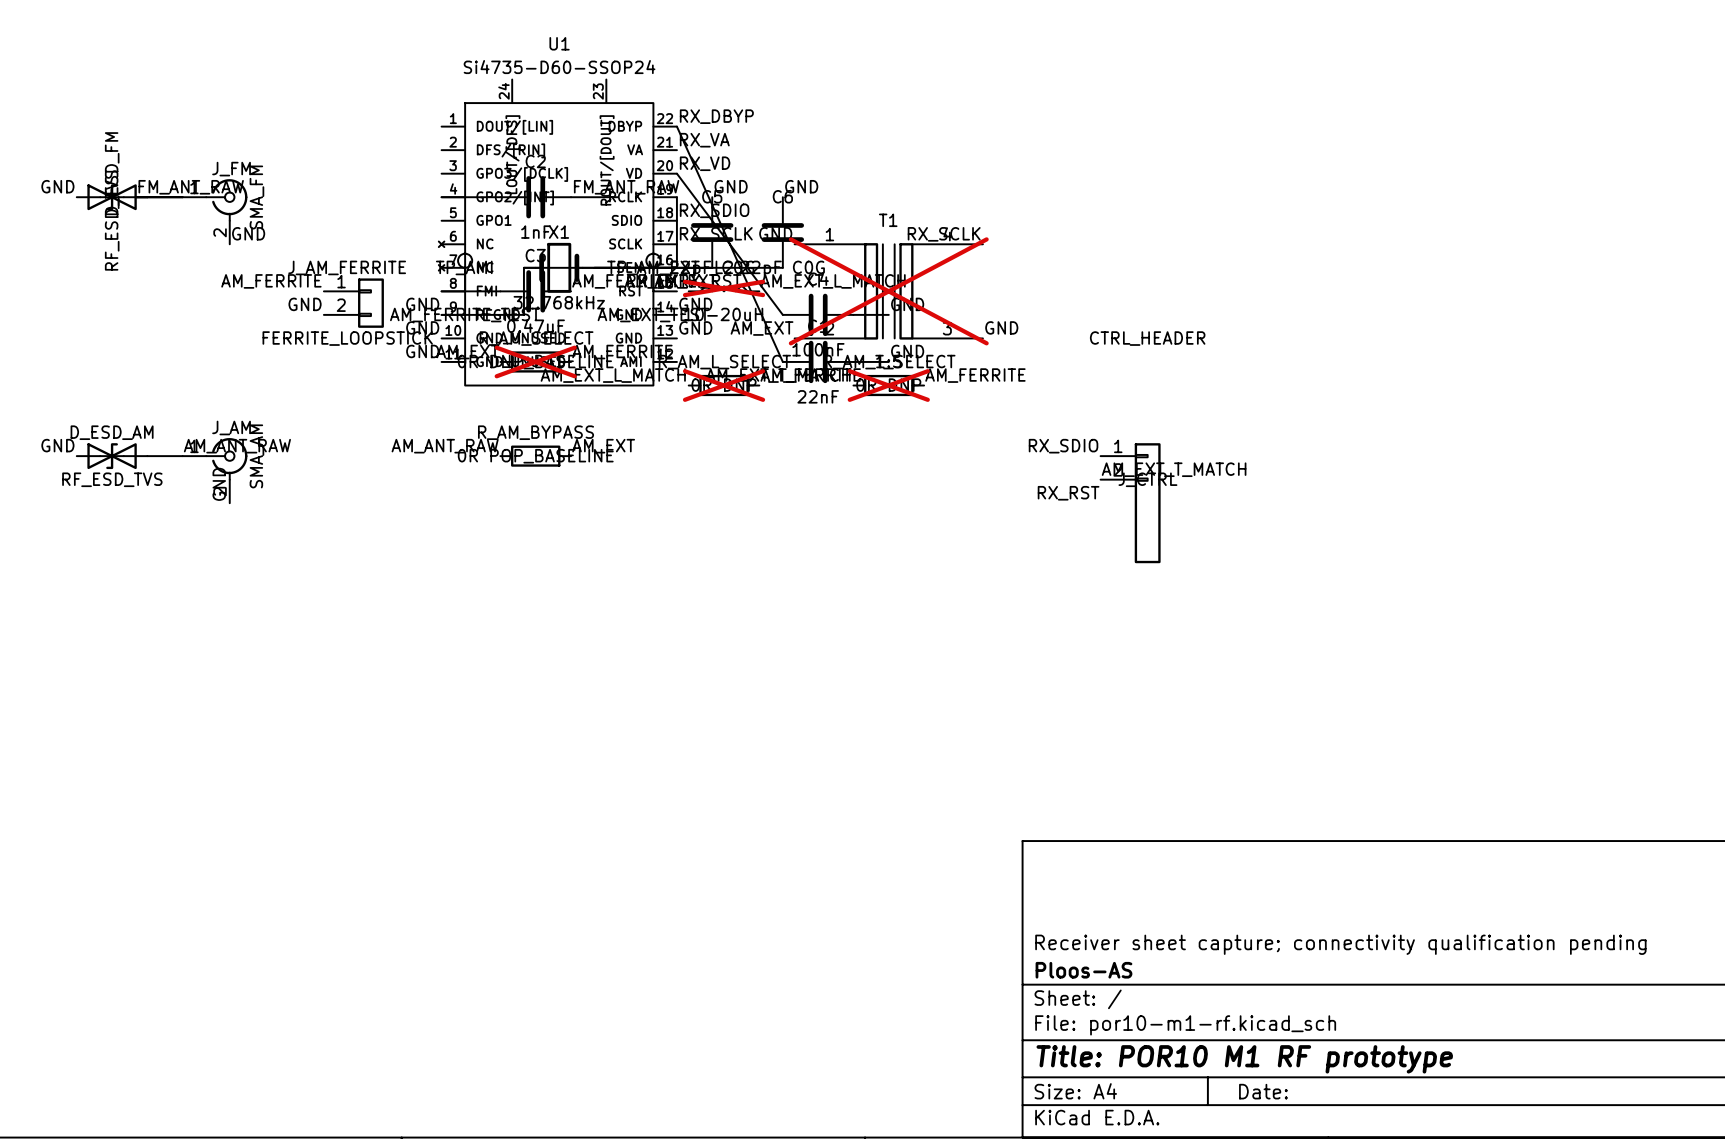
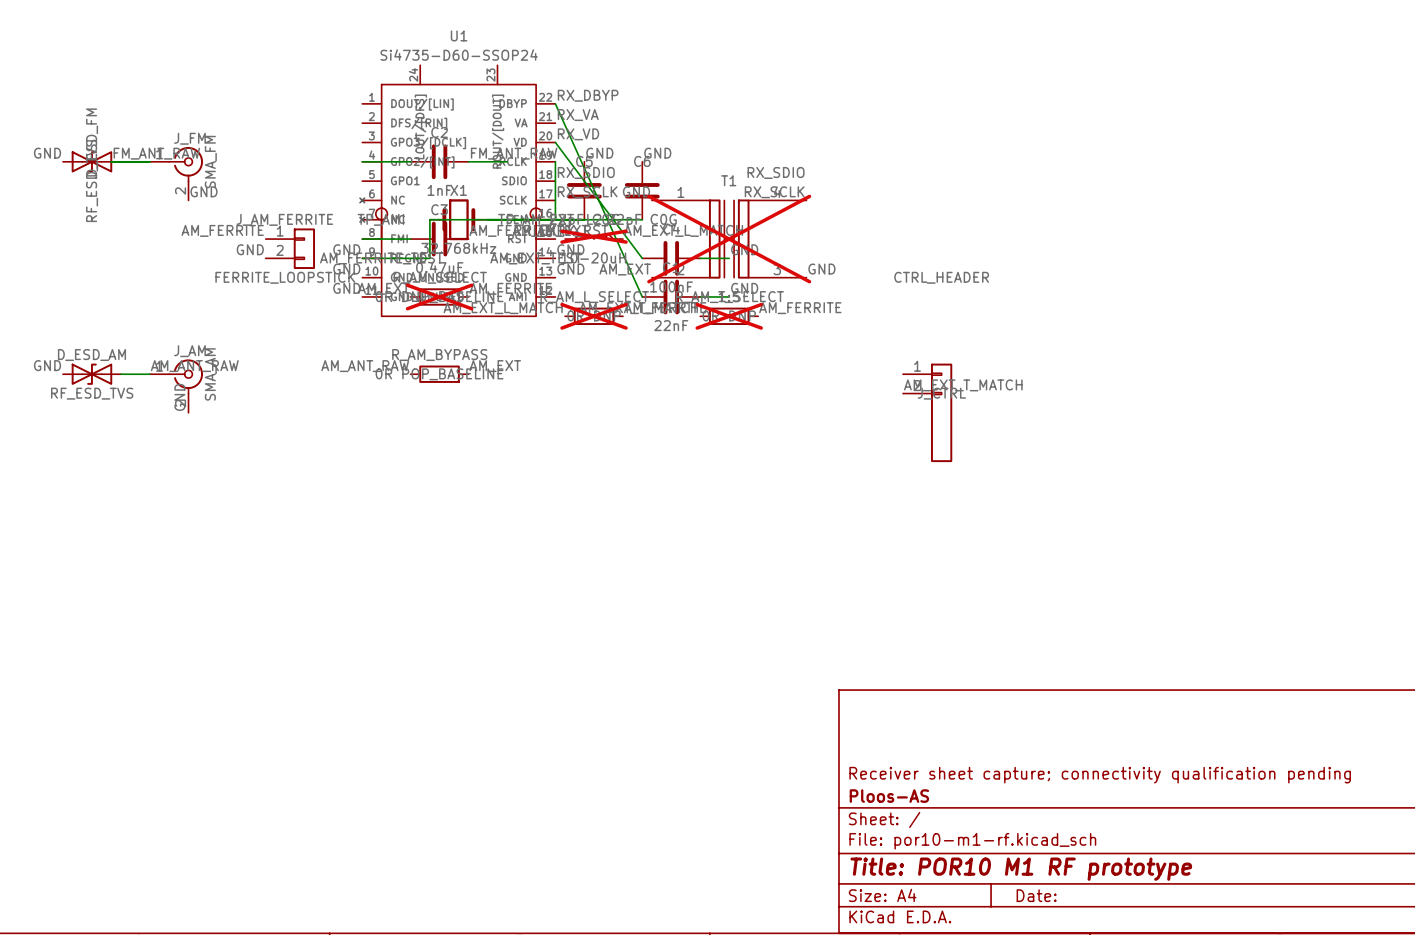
label: none -> RX_SDIO (776, 172)
label: RX_SDIO (1063, 446) -> none
label: RX_RST (1068, 493) -> none

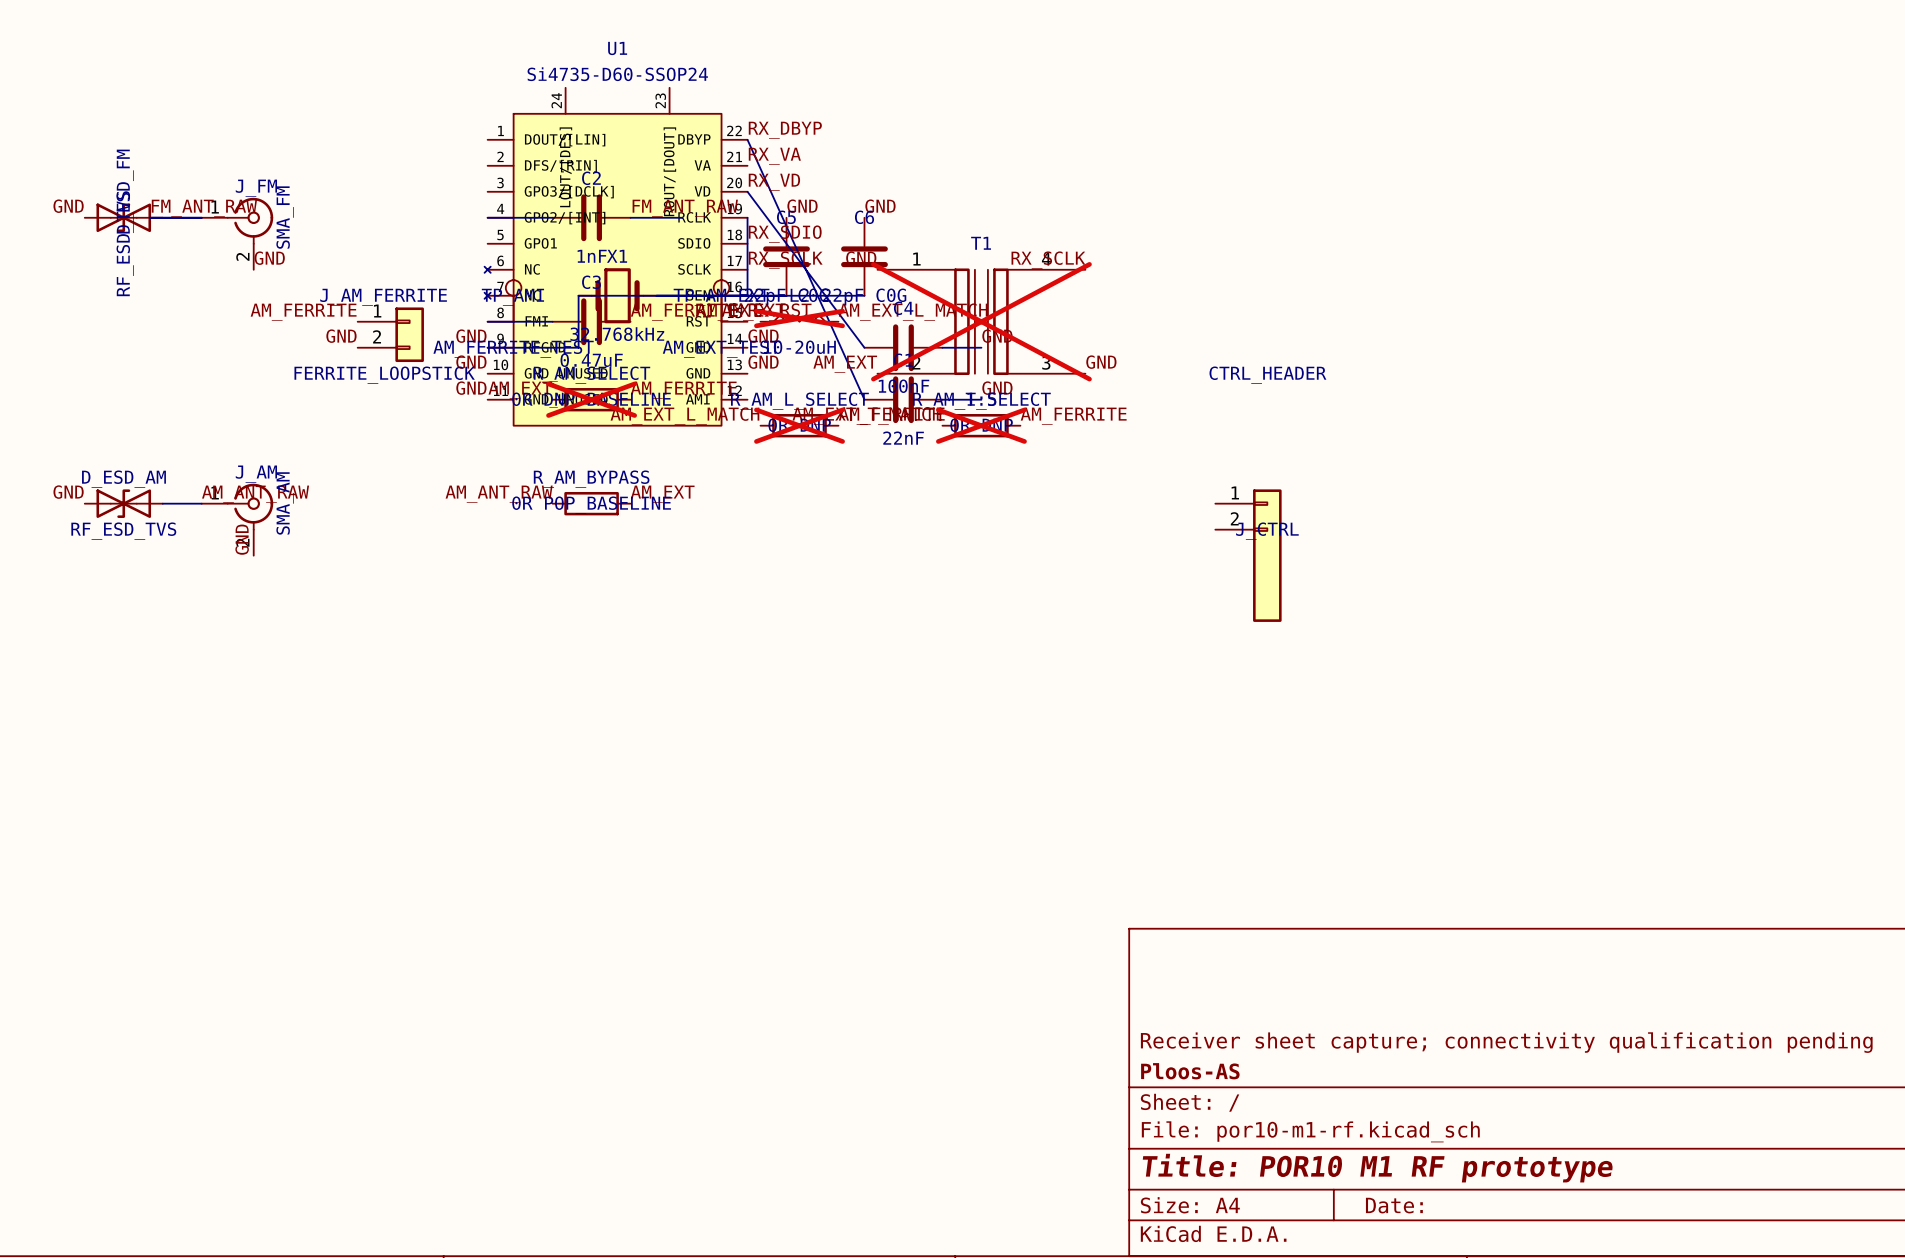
label: RX_SDIO (776, 172) -> none
label: AM_EXT_T_MATCH (963, 385) -> none

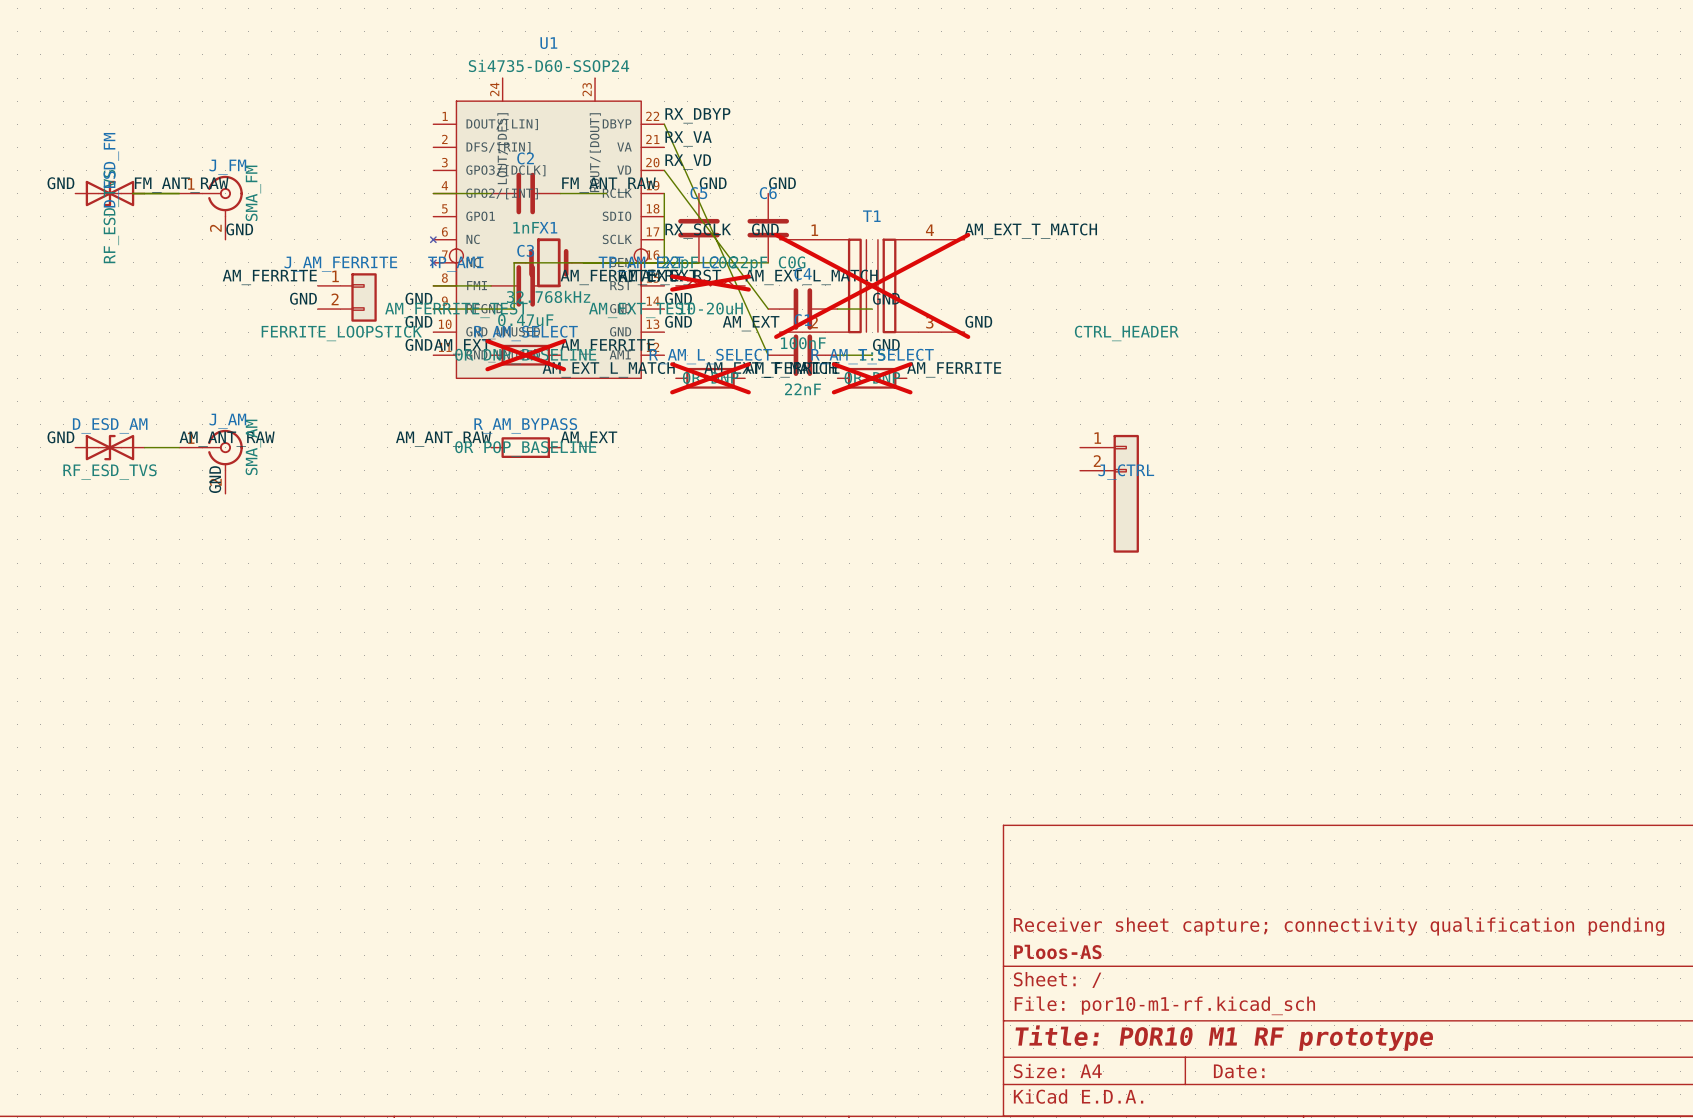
label: RX_SDIO (785, 234) -> none
label: RX_SCLK (1048, 260) -> AM_EXT_T_MATCH (1030, 231)

